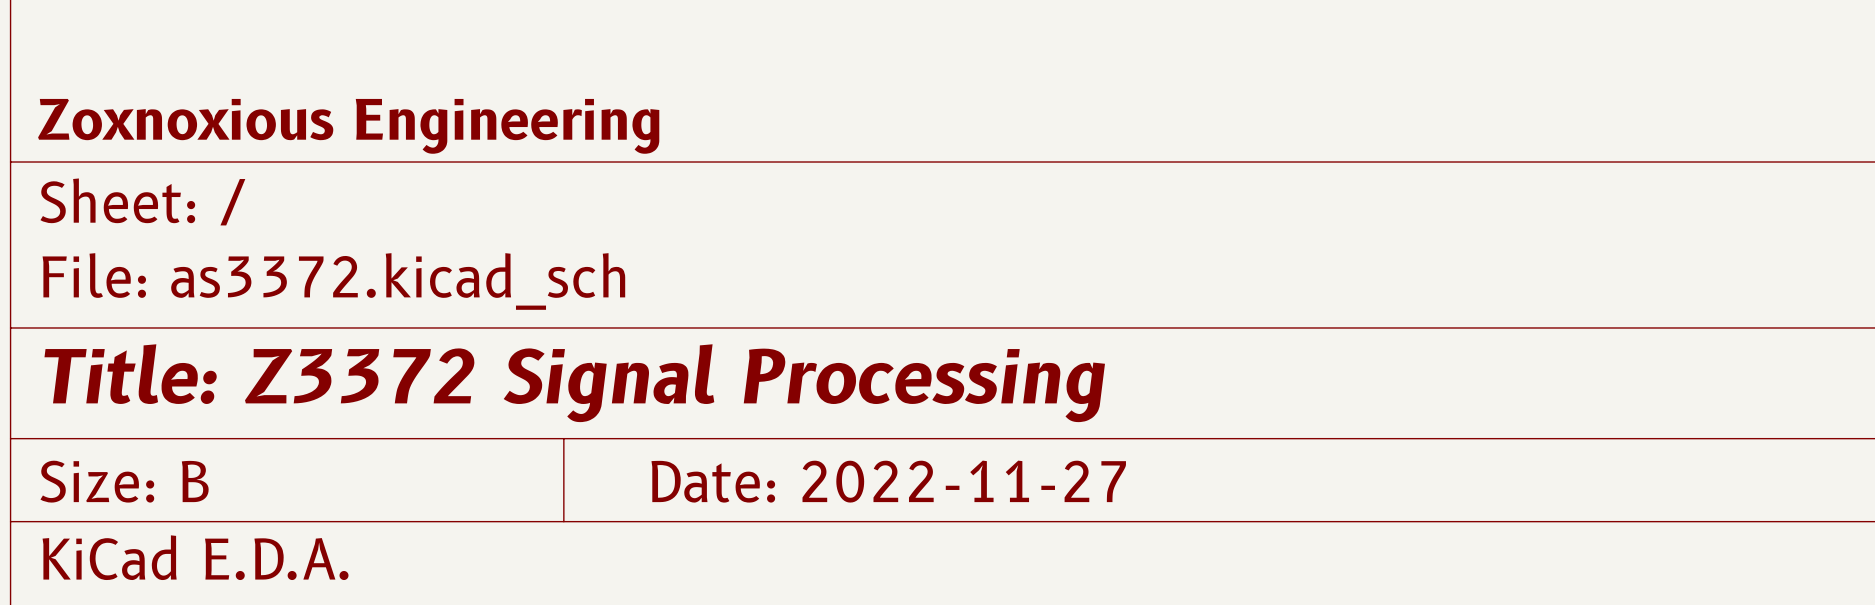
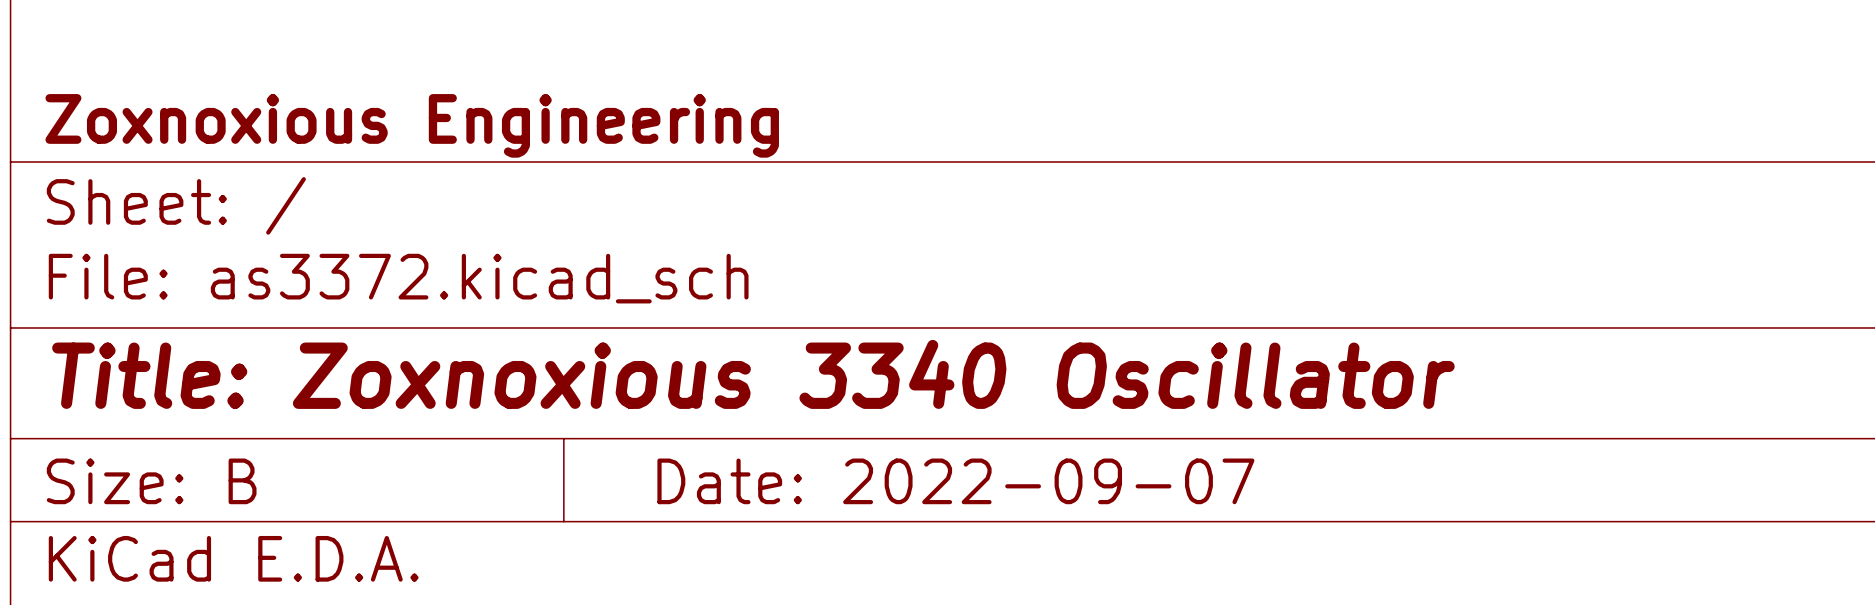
title block: Title: Z3372 Signal Processing (574, 383) -> Title: Zoxnoxious 3340 Oscillator (753, 374)
title block: Date: 2022-11-27 (888, 481) -> Date: 2022-09-07 (955, 481)

